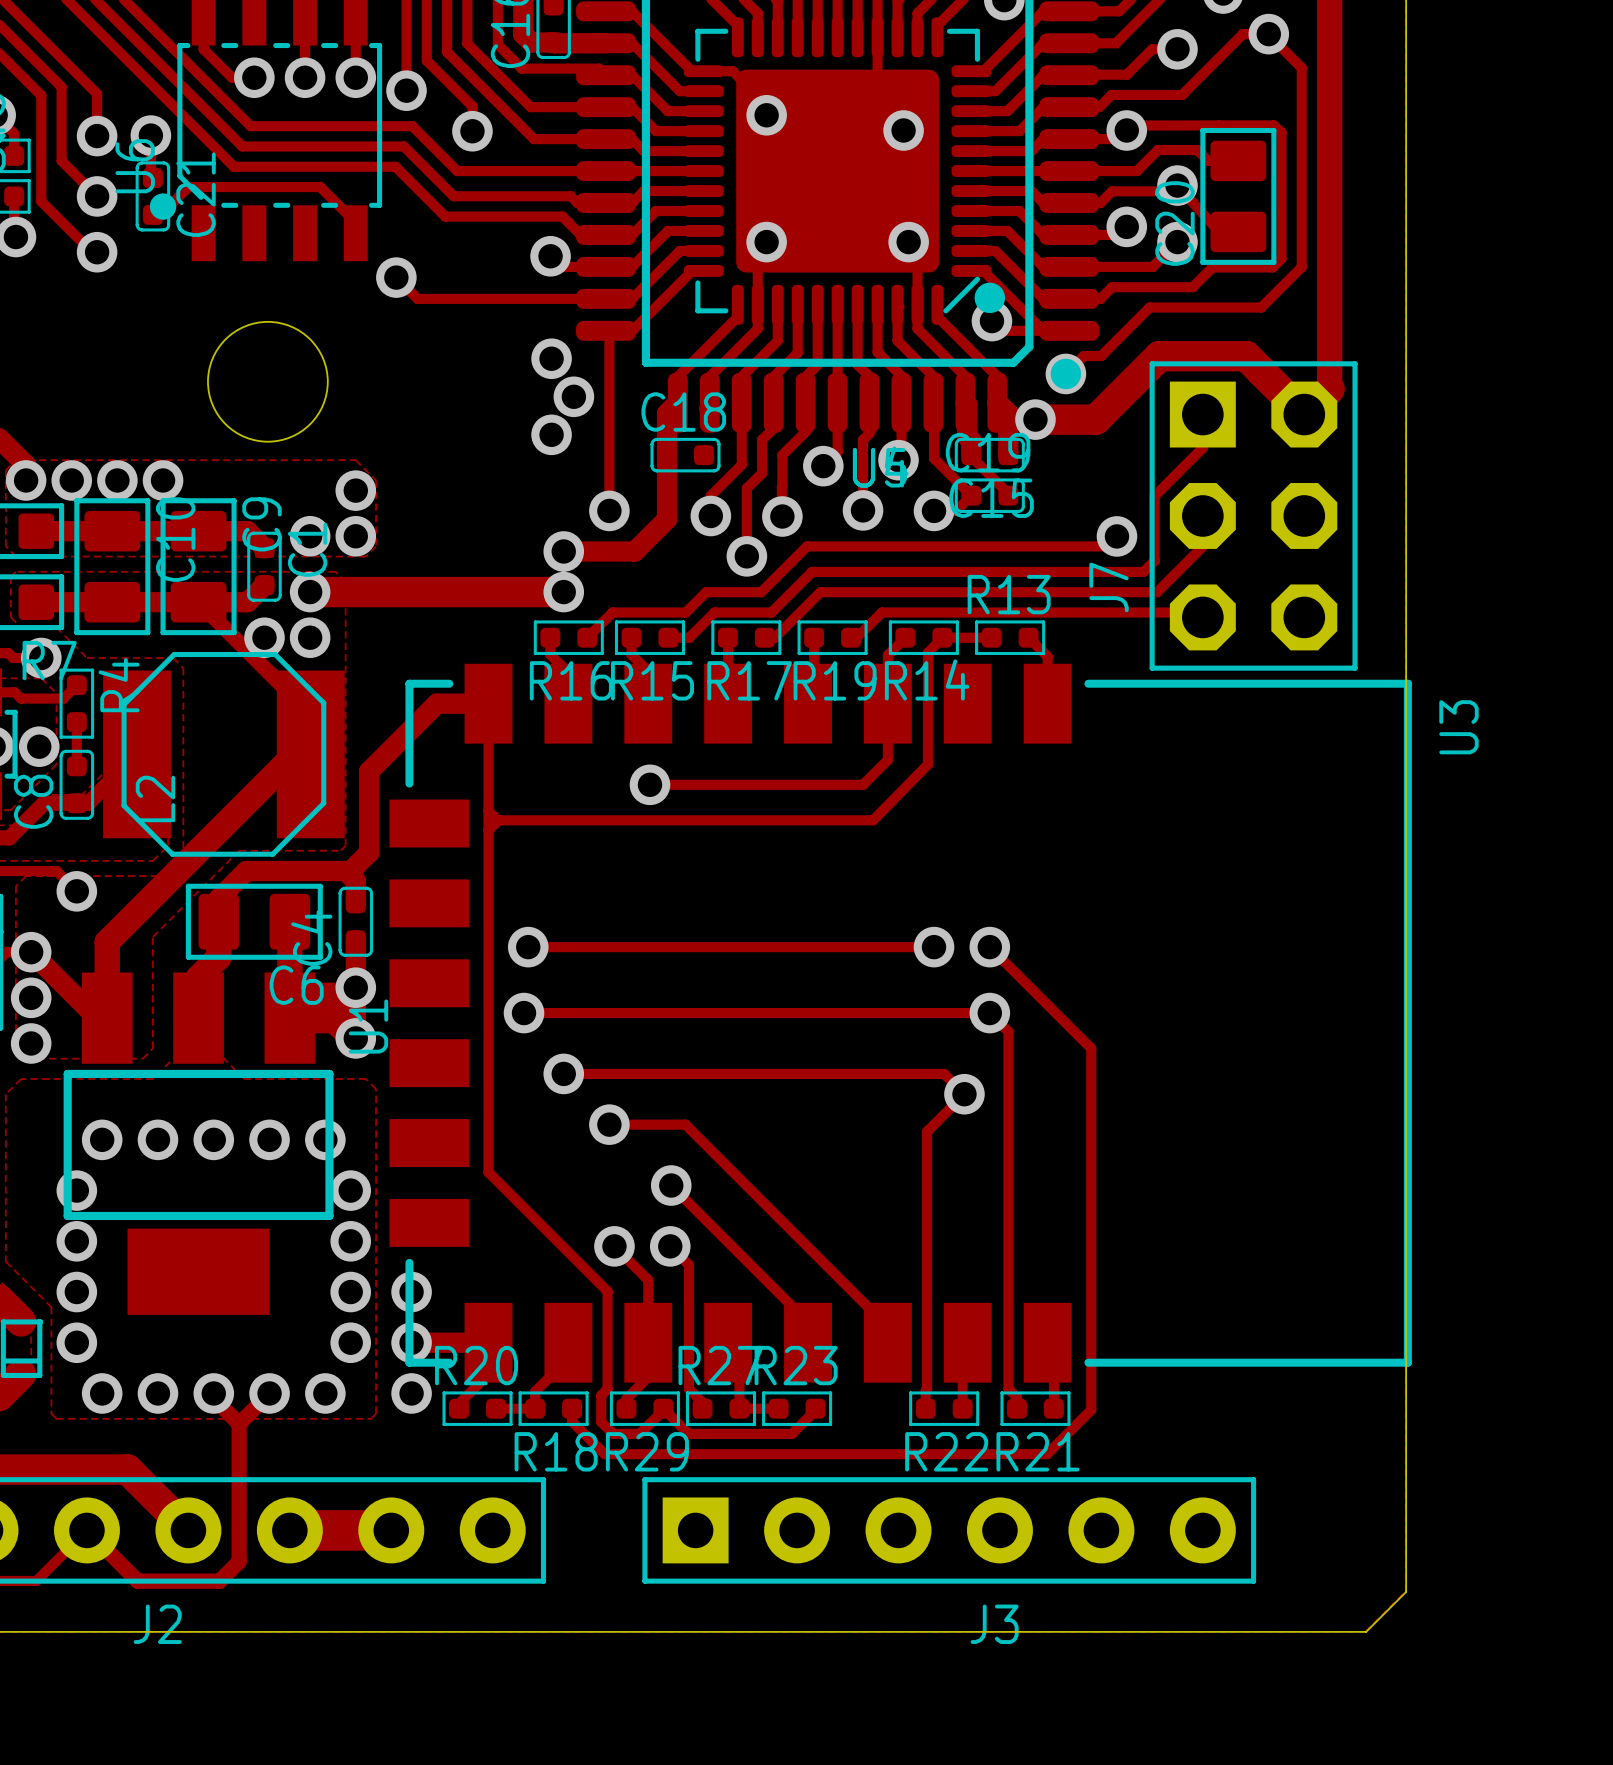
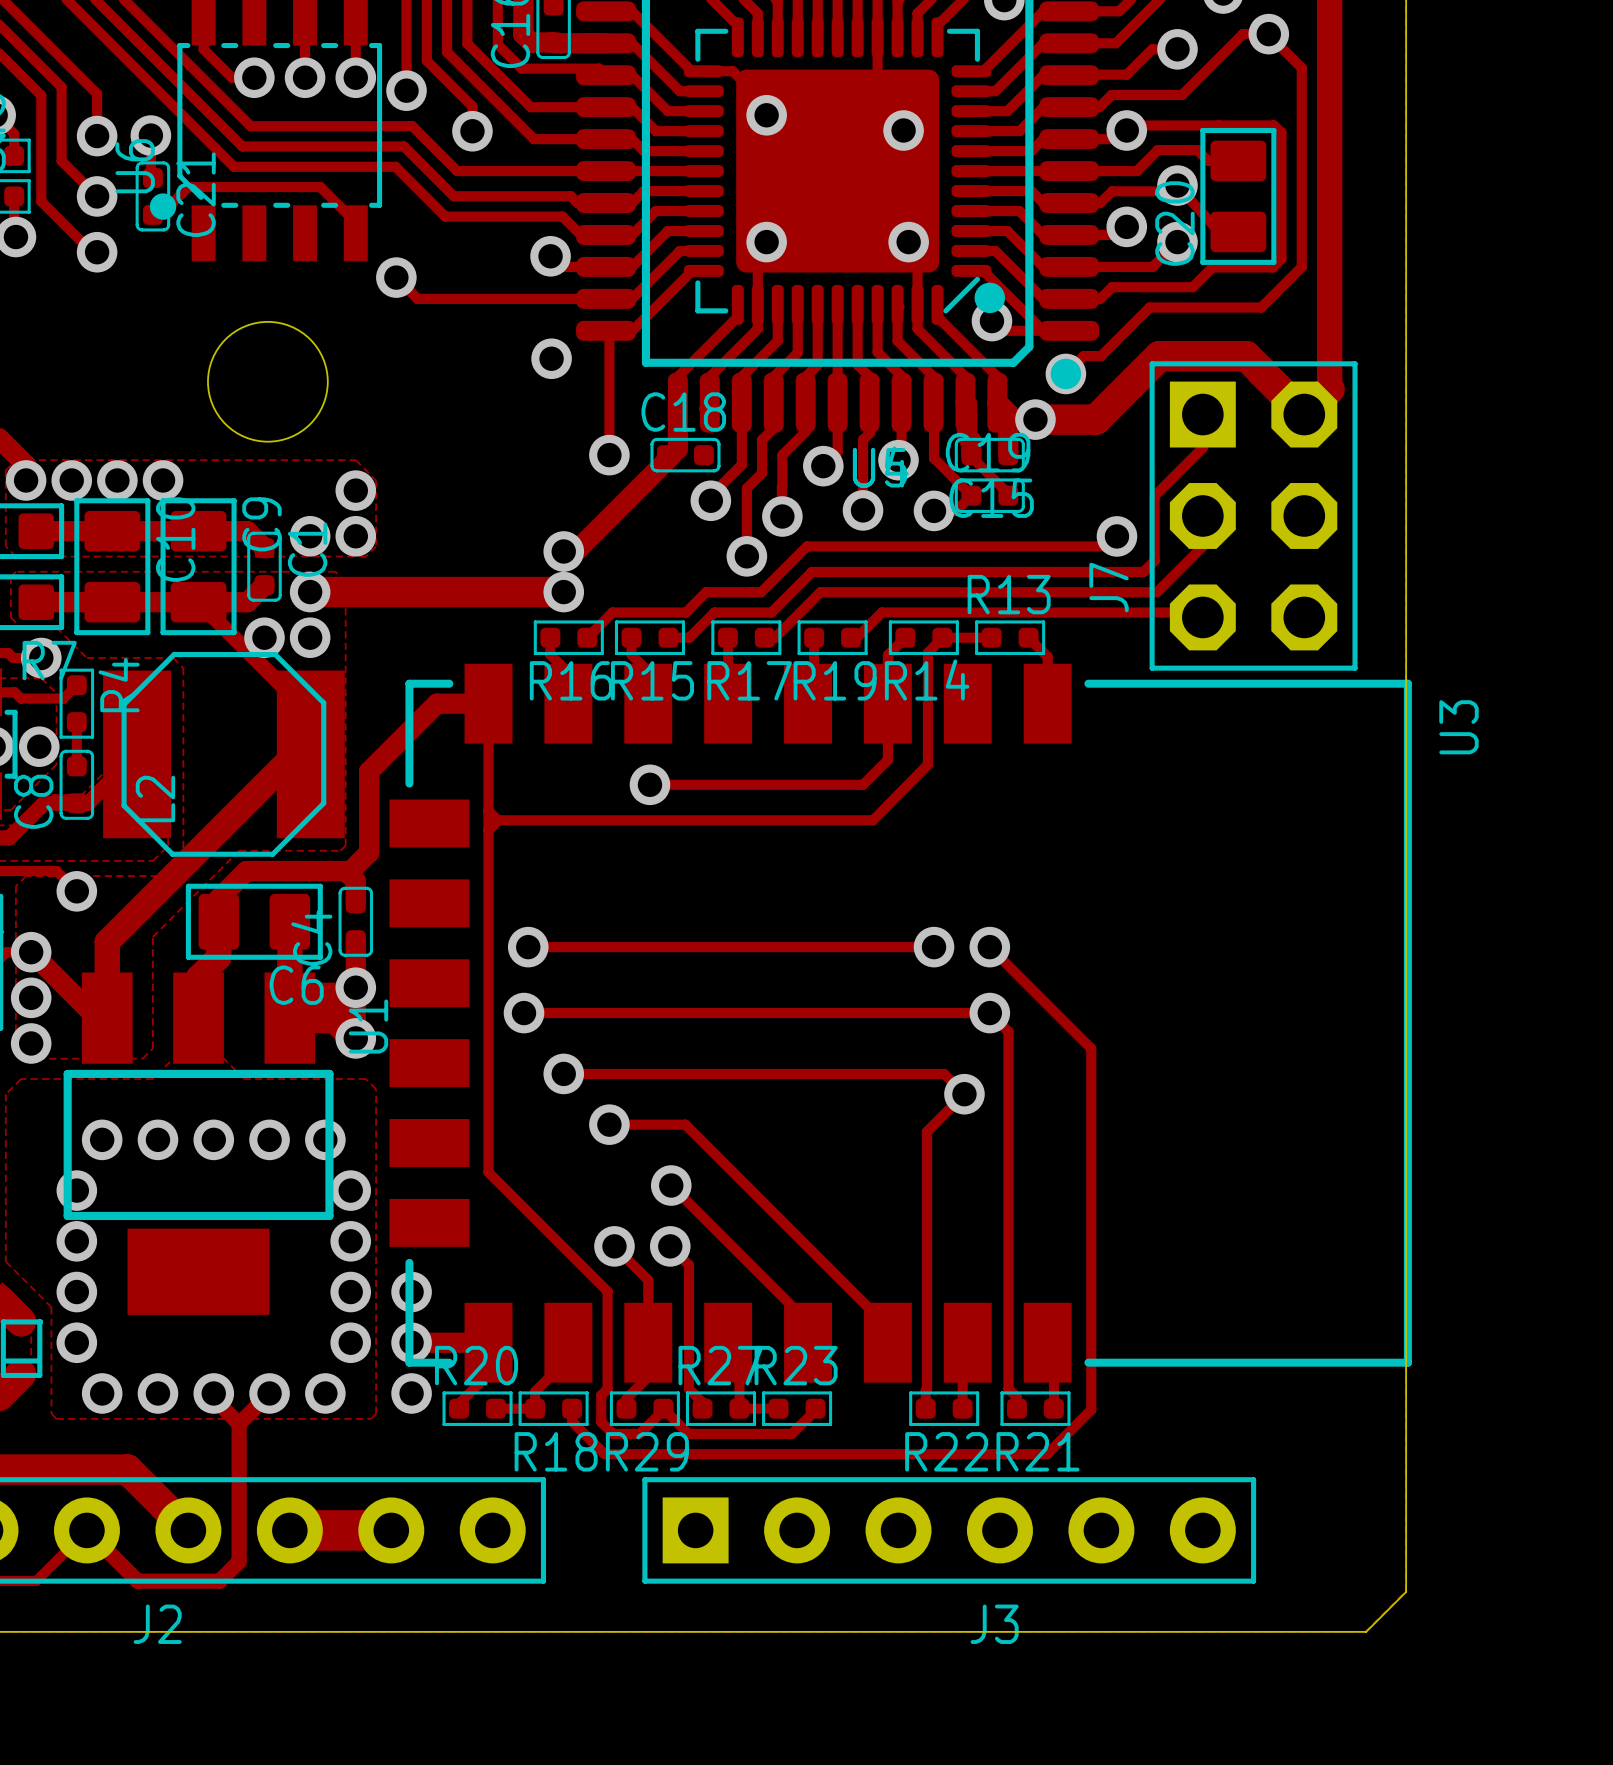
via: (573, 396) -> none
track: (677, 402) (667, 413) (667, 519) (634, 551) (575, 551) -> (677, 402) (677, 449) (575, 551)
via: (551, 434) -> none
track: (609, 455) (609, 510) -> none
via: none -> (609, 455)
via: (609, 510) -> none
via position: (710, 515) -> (710, 500)

